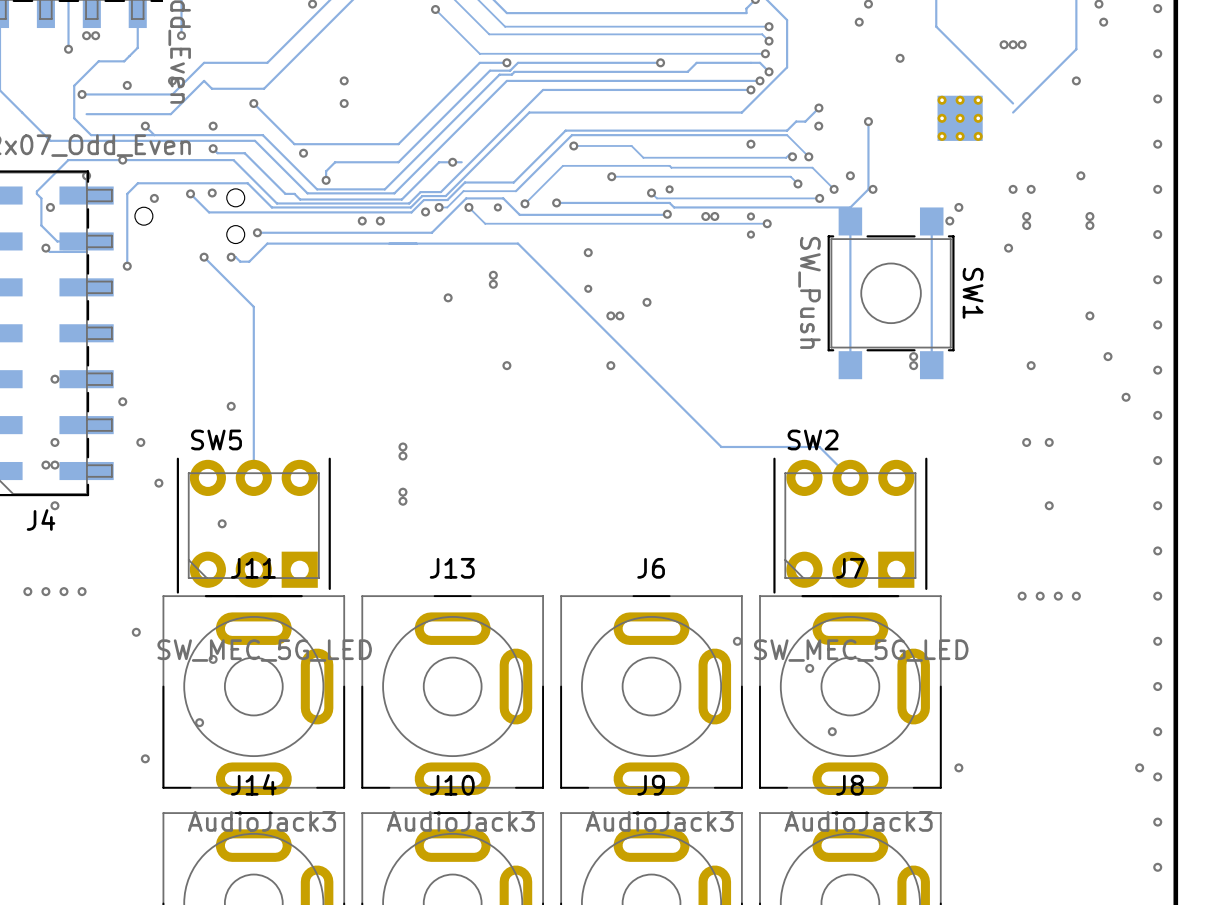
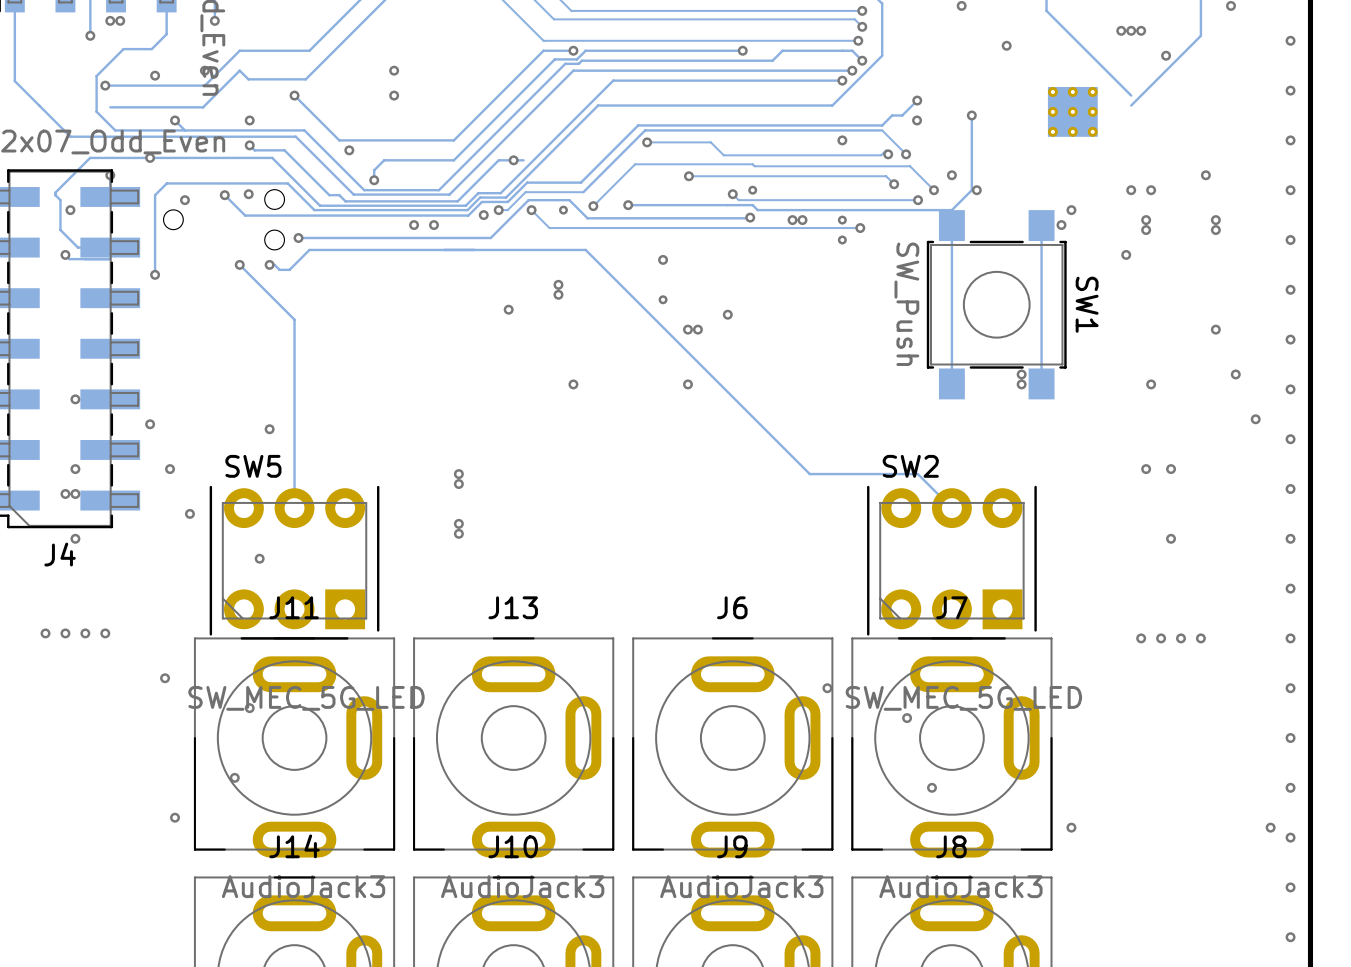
via position: (1076, 80) -> (1166, 55)

